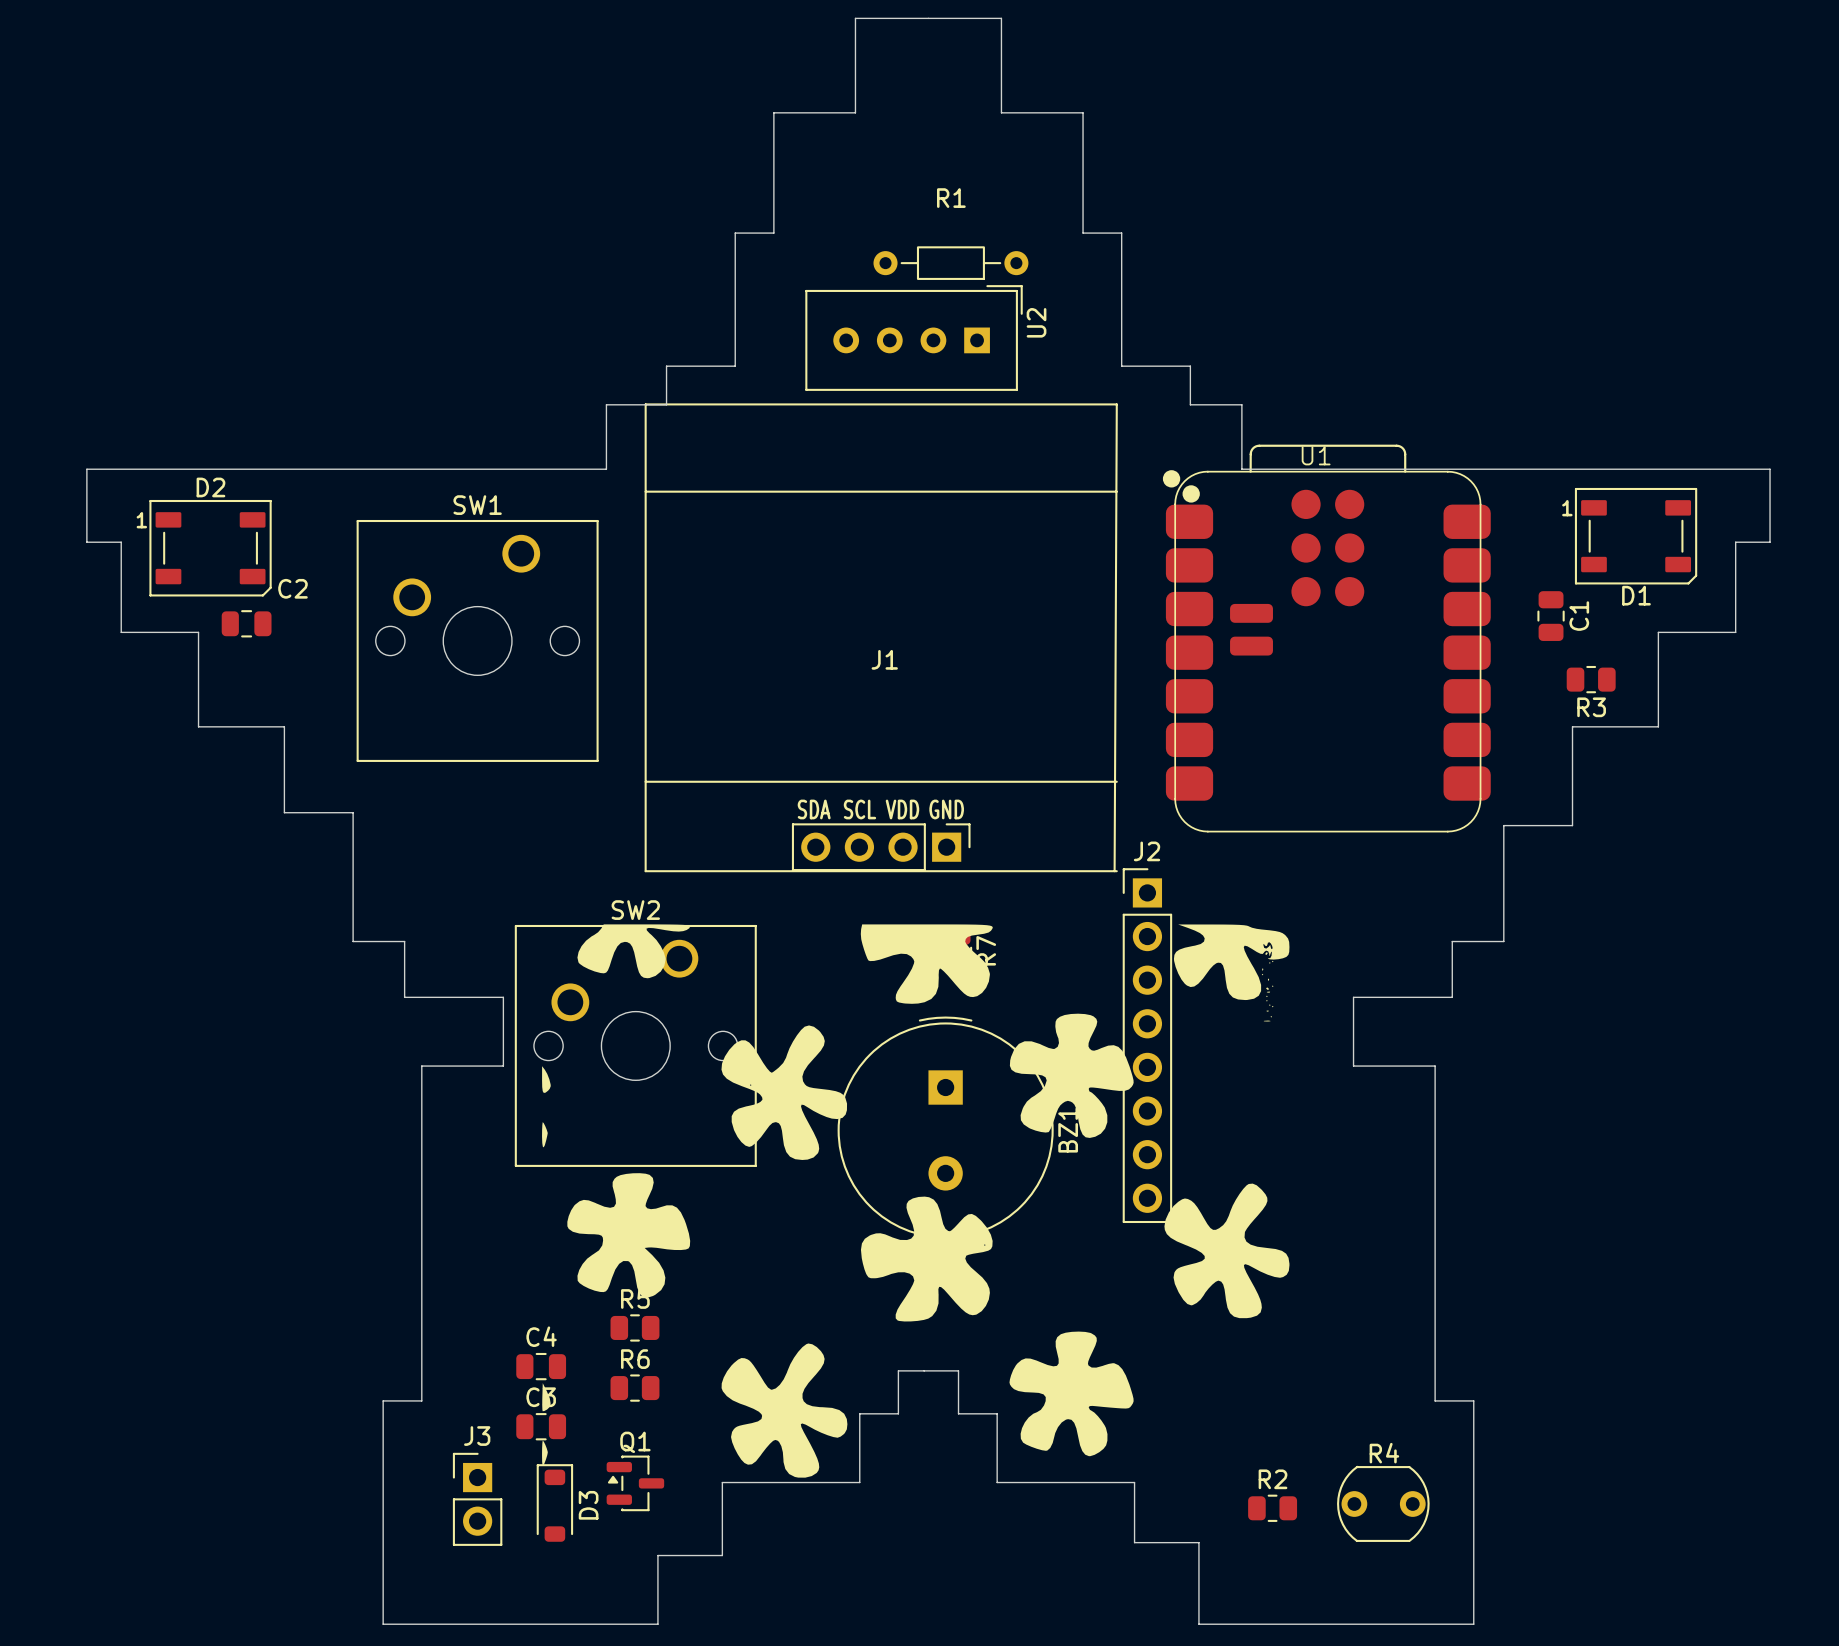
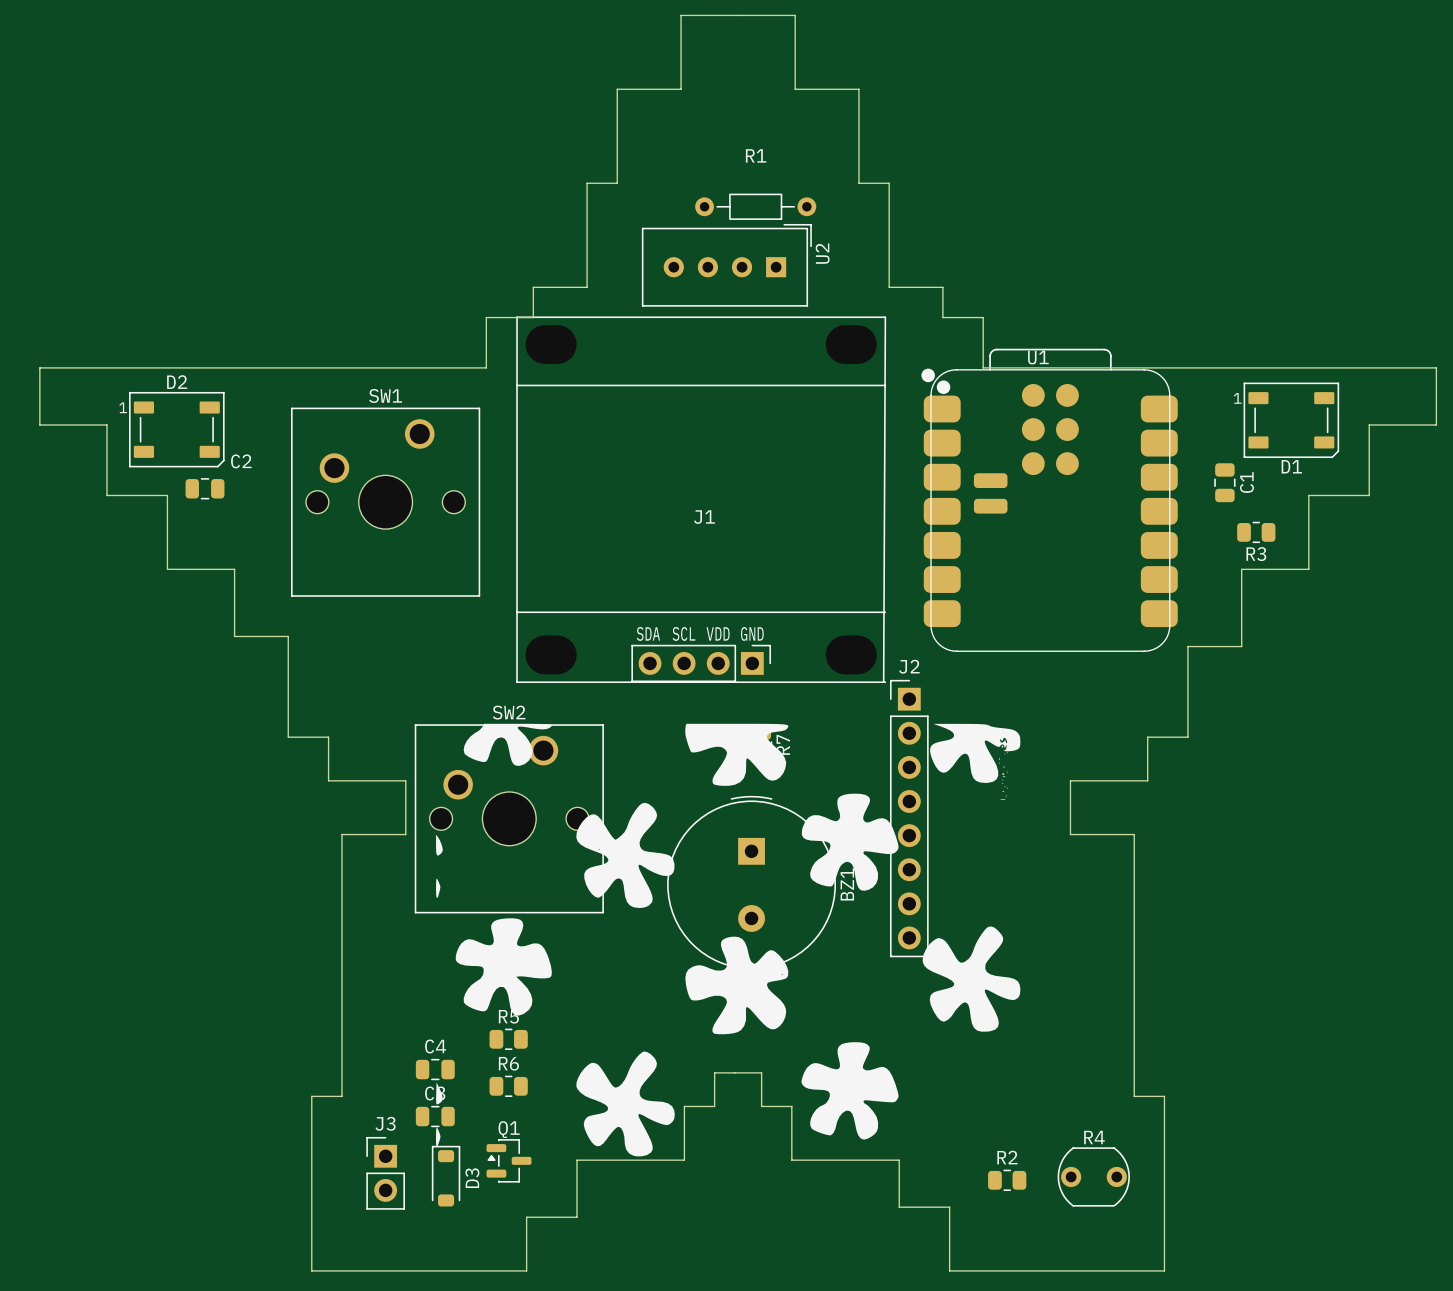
board edge: (86, 469) (86, 542) -> (80, 367) (39, 367) (39, 424) (80, 424)
board edge: (1770, 469) (1770, 542) -> (1396, 367) (1436, 367) (1436, 424) (1396, 424)

